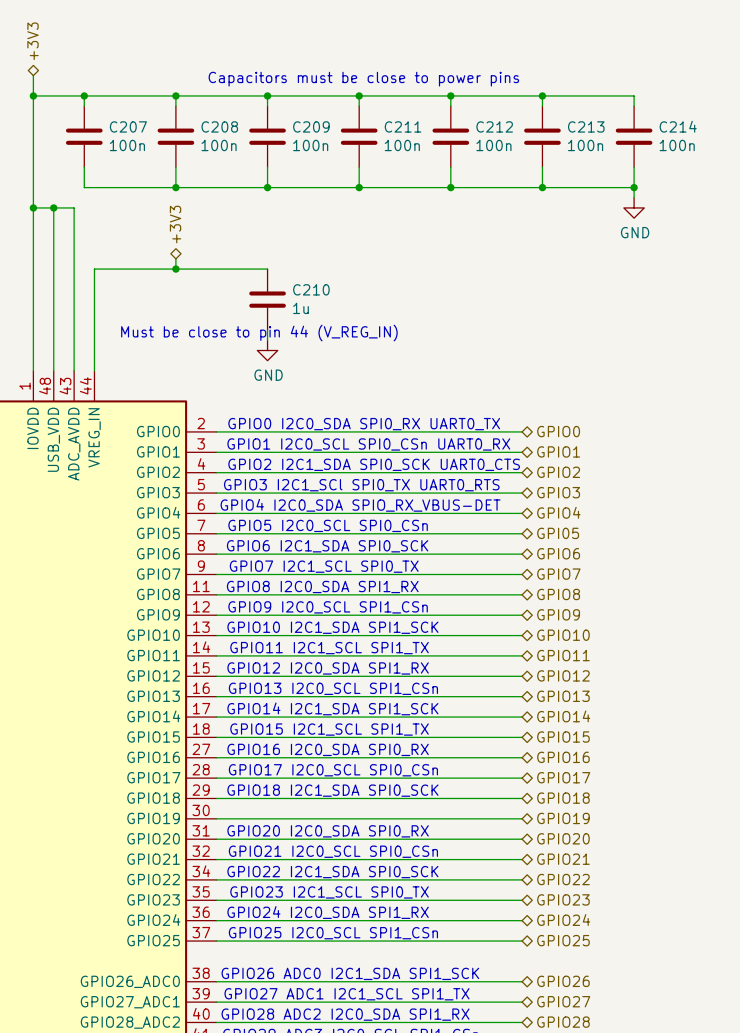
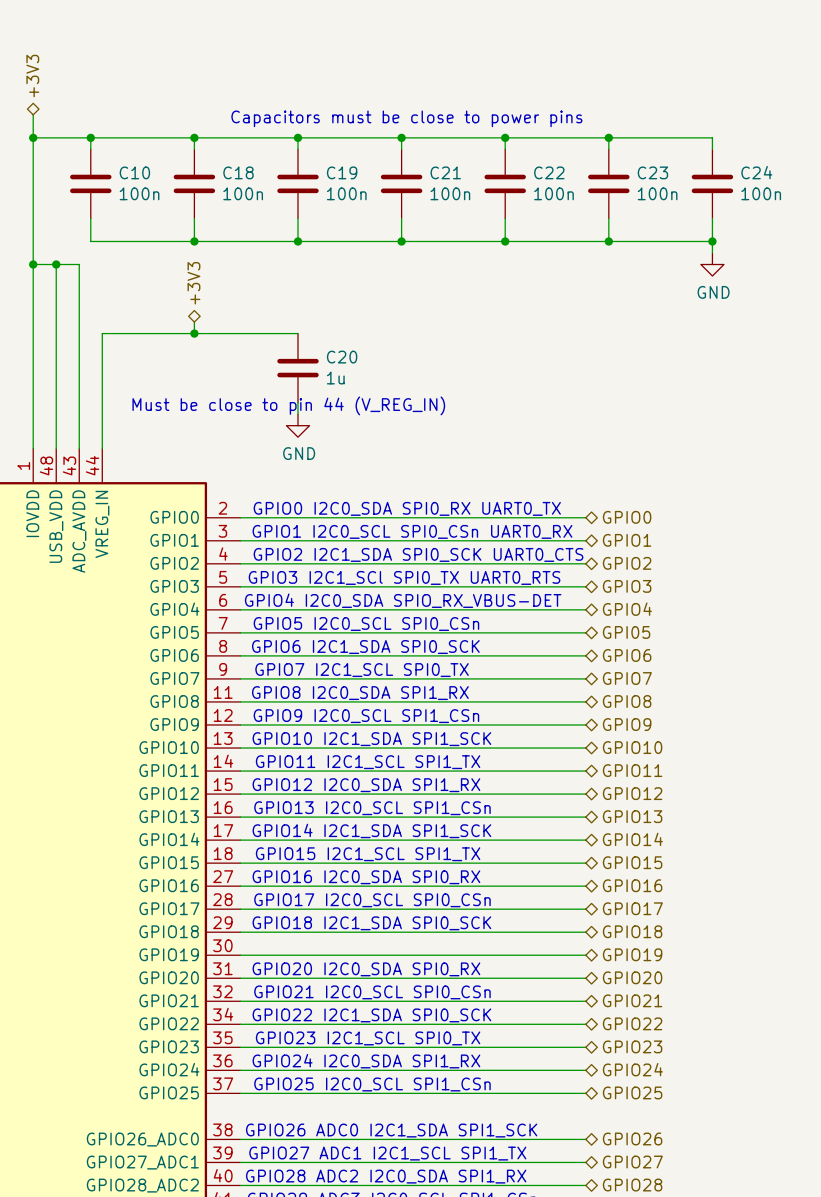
C207 name: C207 (128, 126) -> C10 (134, 172)
C208 name: C208 (219, 126) -> C18 (238, 172)
C209 name: C209 (311, 126) -> C19 (342, 172)
C211 name: C211 (403, 126) -> C21 (445, 172)
C212 name: C212 (494, 126) -> C22 (549, 172)
C213 name: C213 (586, 126) -> C23 (652, 172)
C214 name: C214 (678, 126) -> C24 (756, 172)
C210 name: C210 (311, 289) -> C20 (342, 357)

